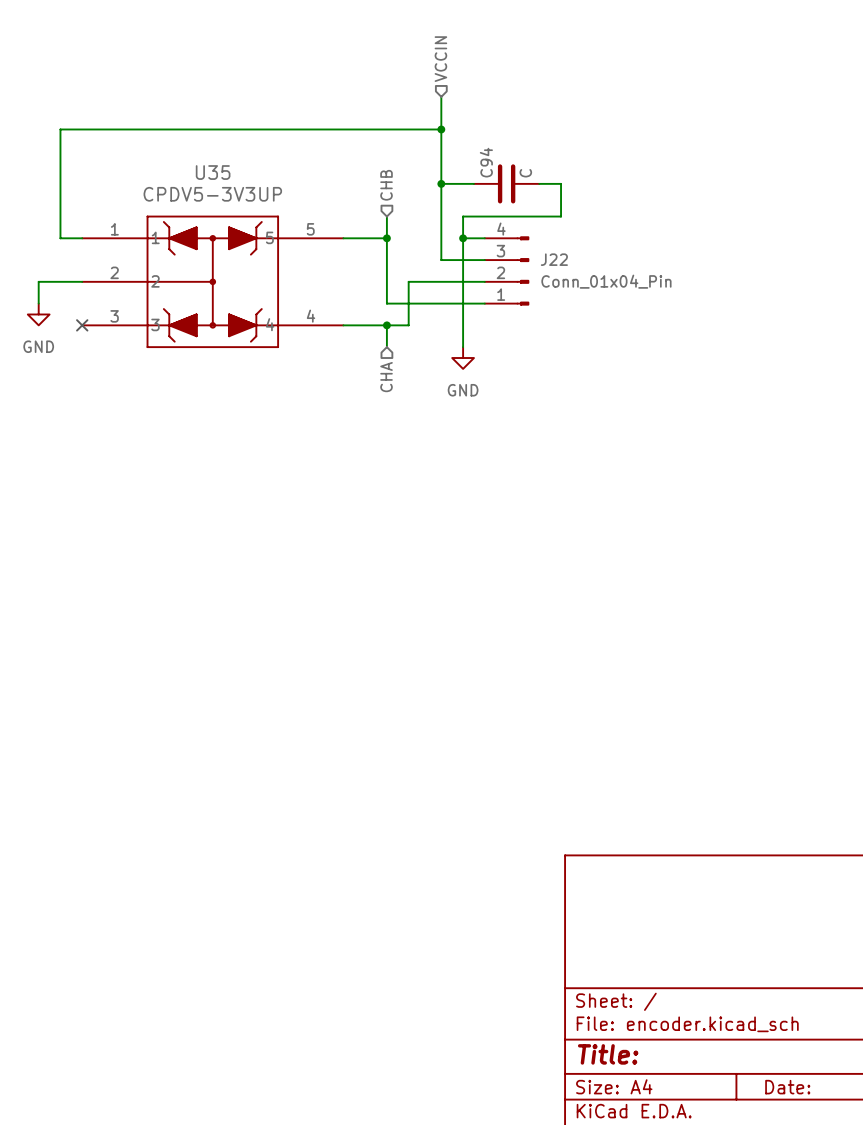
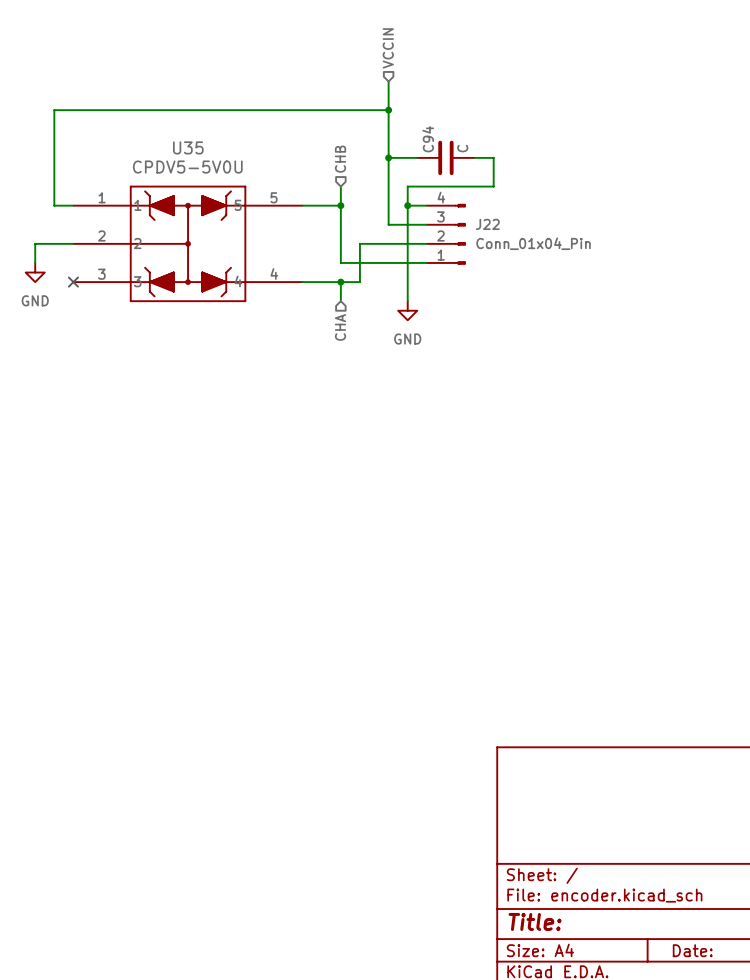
U35 value: CPDV5-3V3UP (212, 194) -> CPDV5-5V0U (187, 167)

